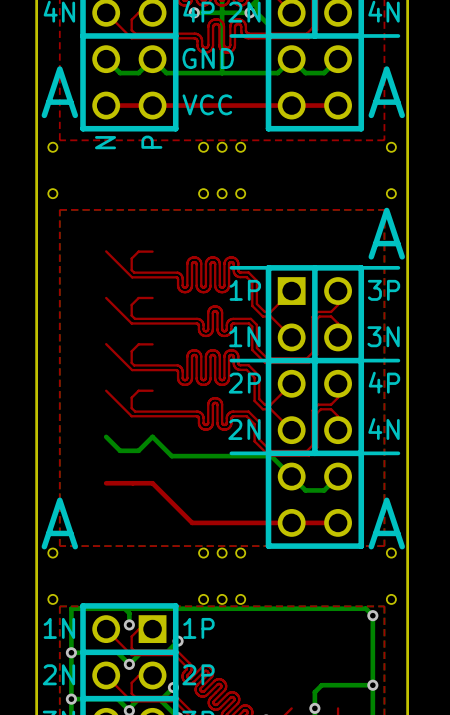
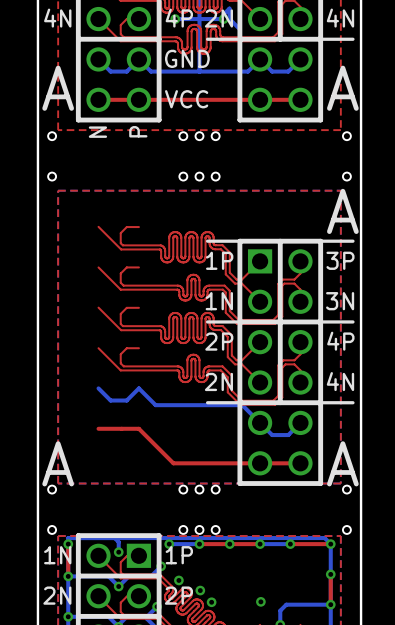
top track: none -> (68, 544) (68, 576)
via: none -> (68, 544)
bottom track: none -> (169, 544) (199, 544)
via: none -> (169, 544)
top track: none -> (199, 544) (260, 544)
via: none -> (199, 544)
via: none -> (229, 544)
bottom track: none -> (260, 544) (290, 544)
via: none -> (260, 544)
top track: none -> (290, 544) (330, 544)
via: none -> (290, 544)
top track: none -> (330, 574) (330, 604)
via: none -> (330, 574)
via: none -> (178, 580)
via: none -> (200, 590)
via: none -> (260, 601)
via: none -> (211, 602)

